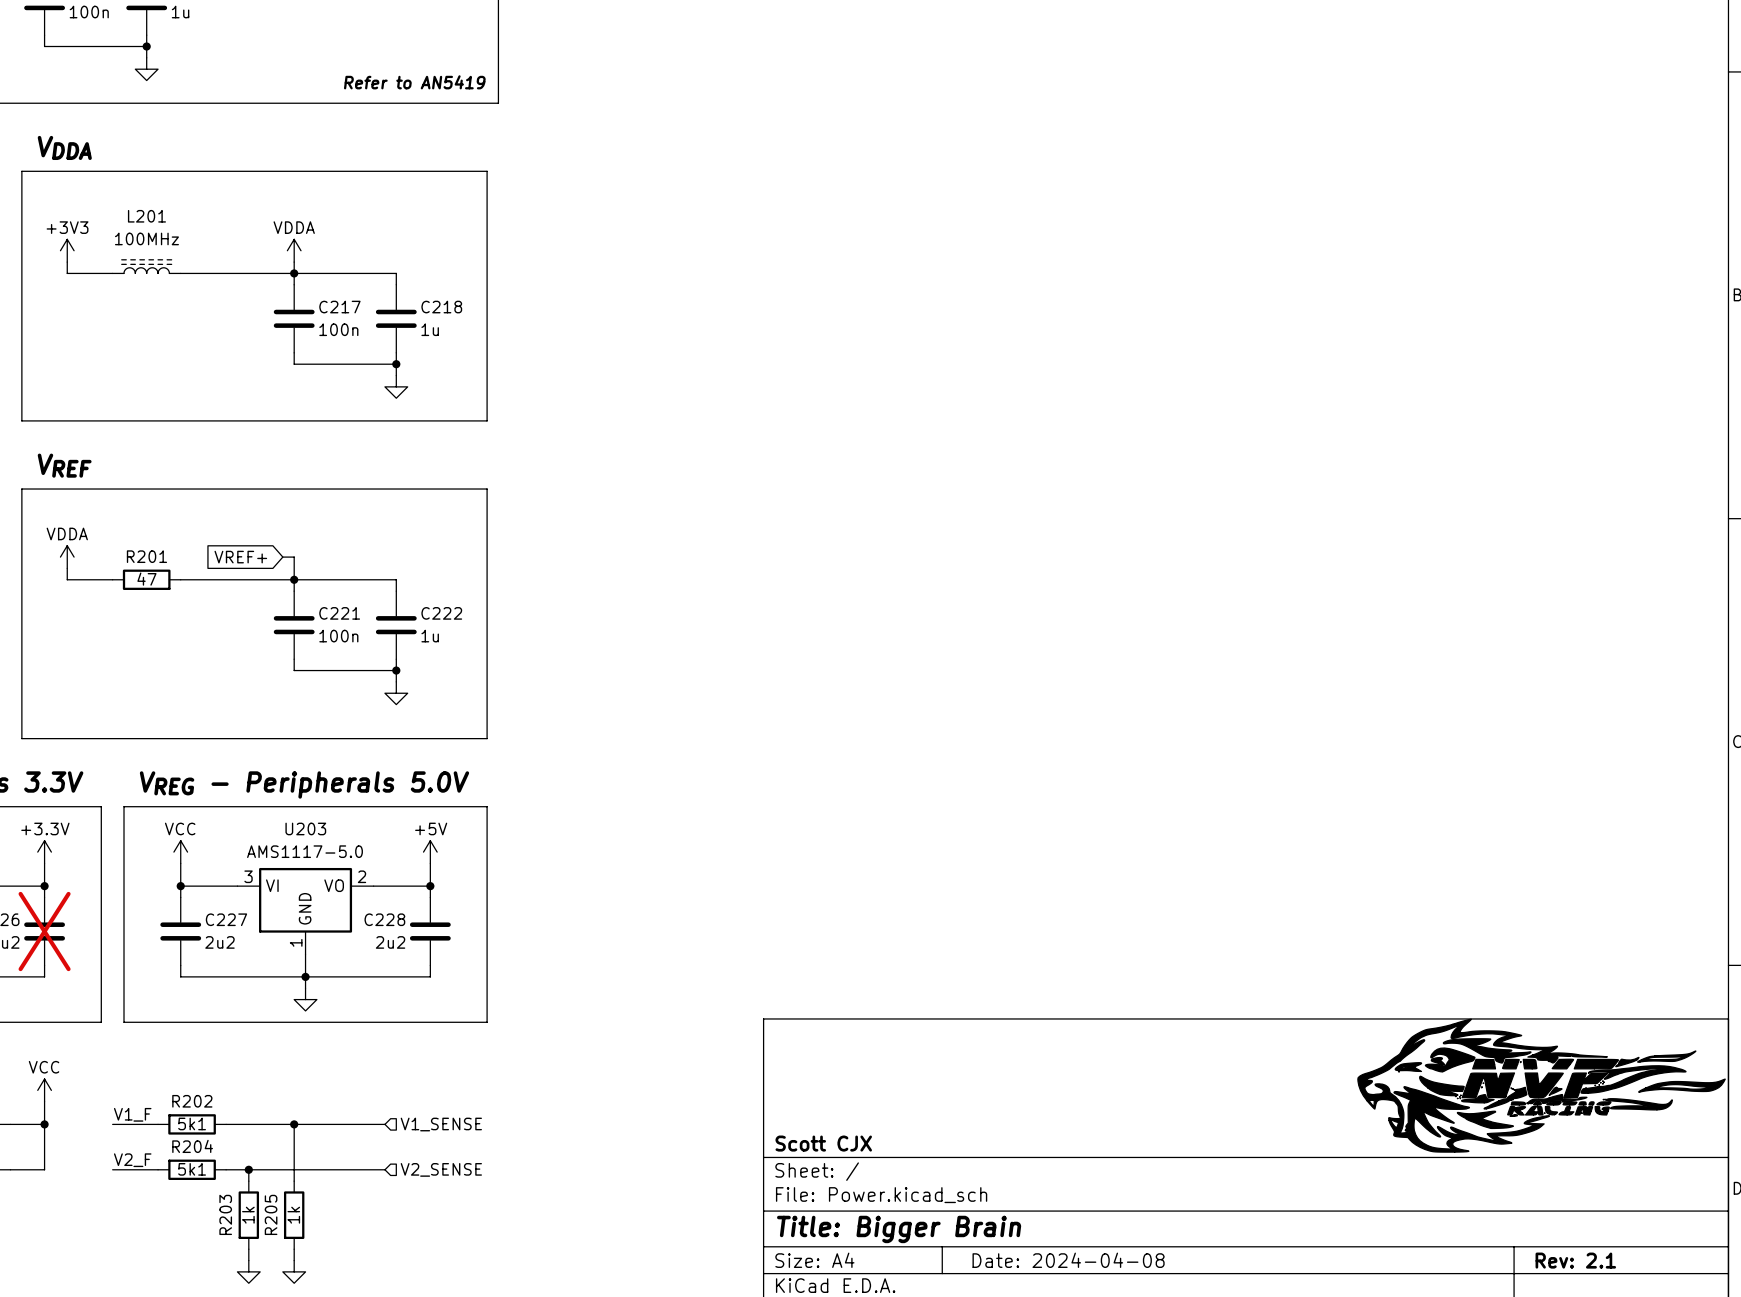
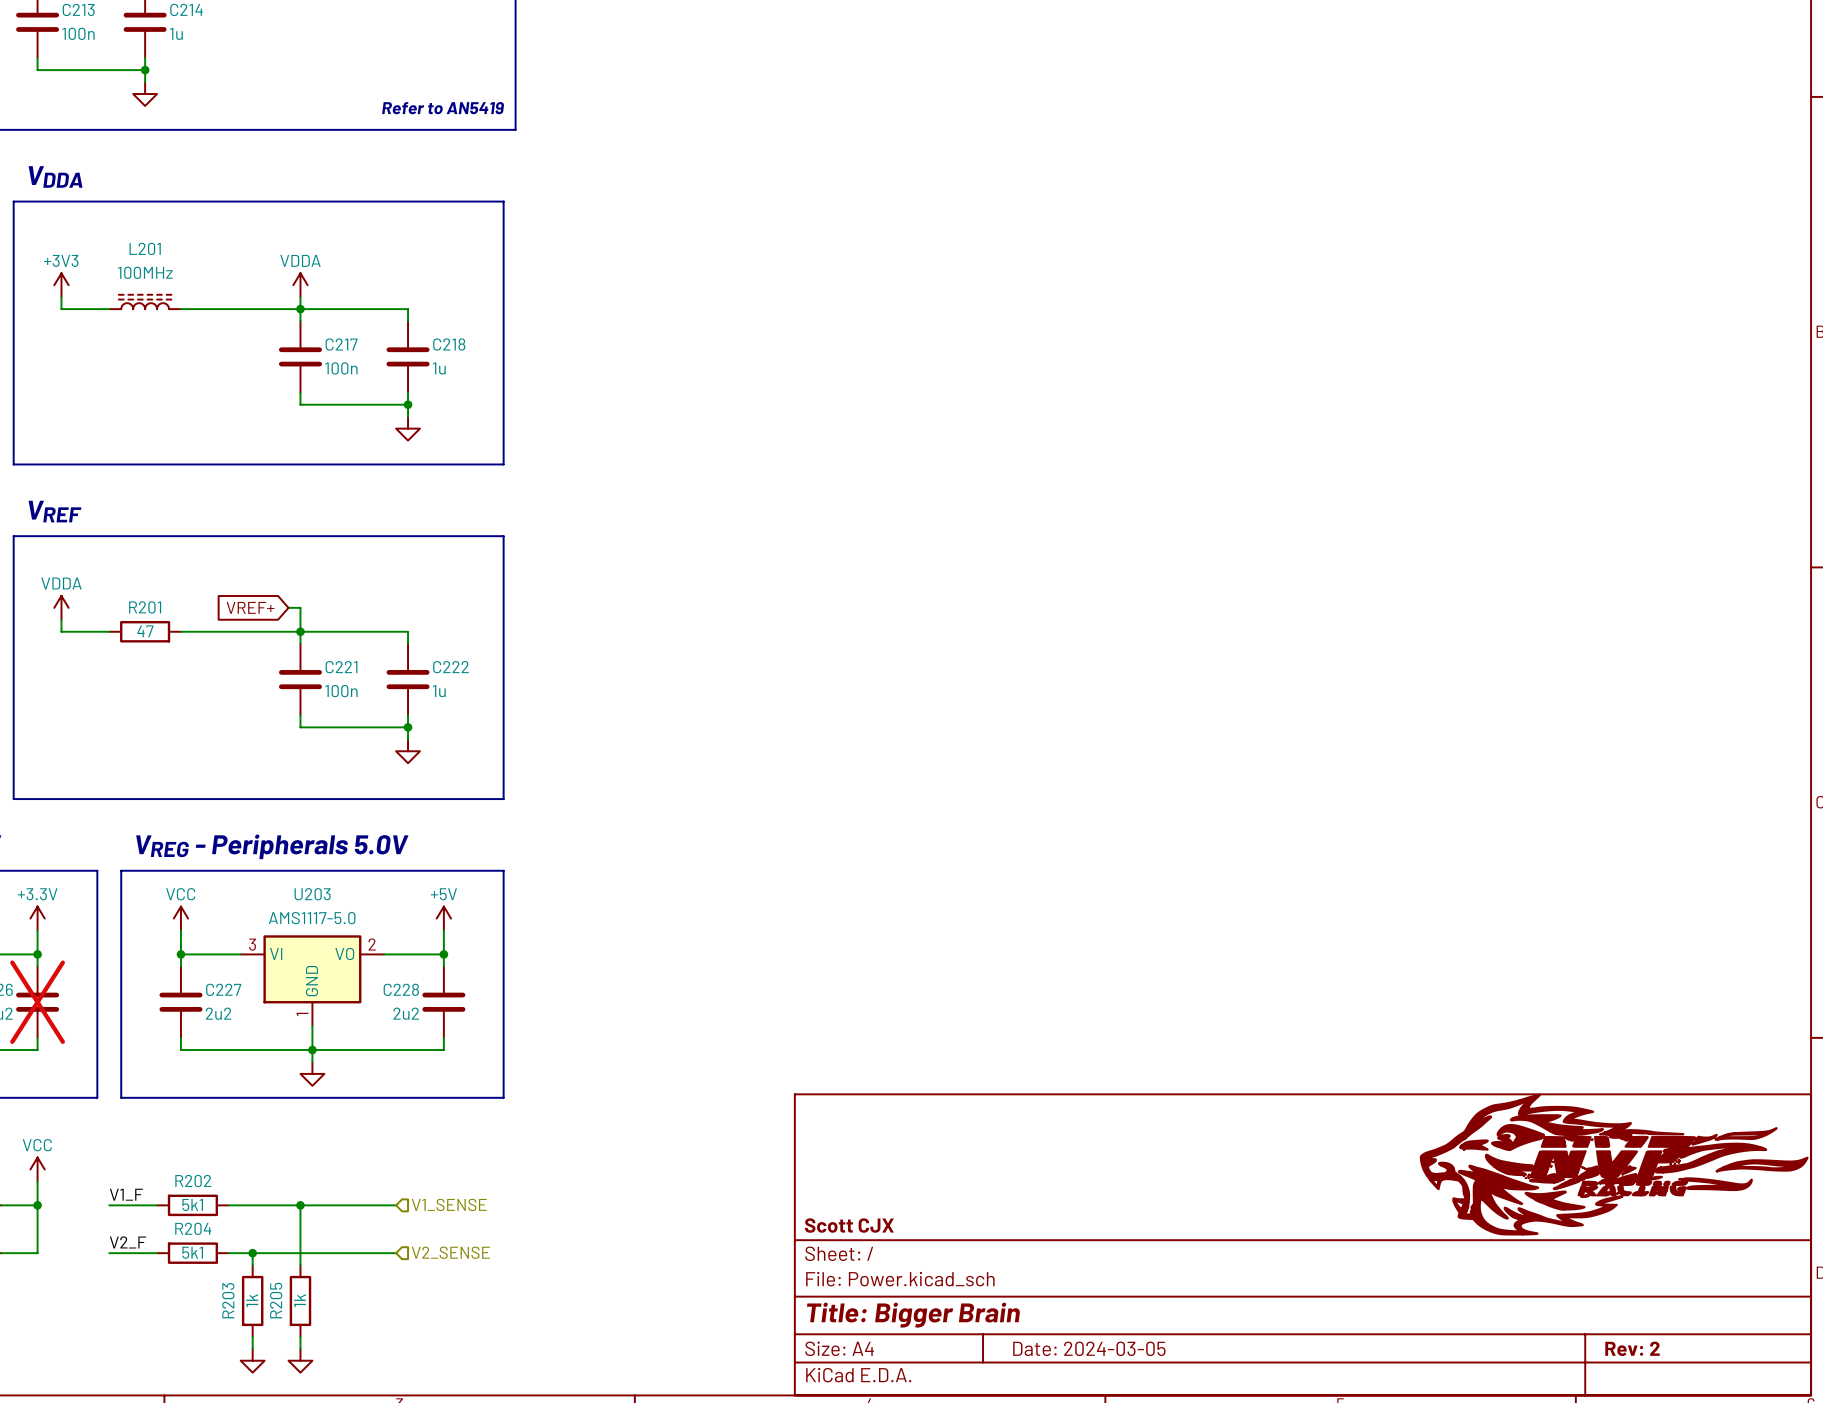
title block: Date: 2024-04-08 (1068, 1260) -> Date: 2024-03-05 (1089, 1348)
title block: Rev: 2.1 (1575, 1260) -> Rev: 2 (1632, 1348)

